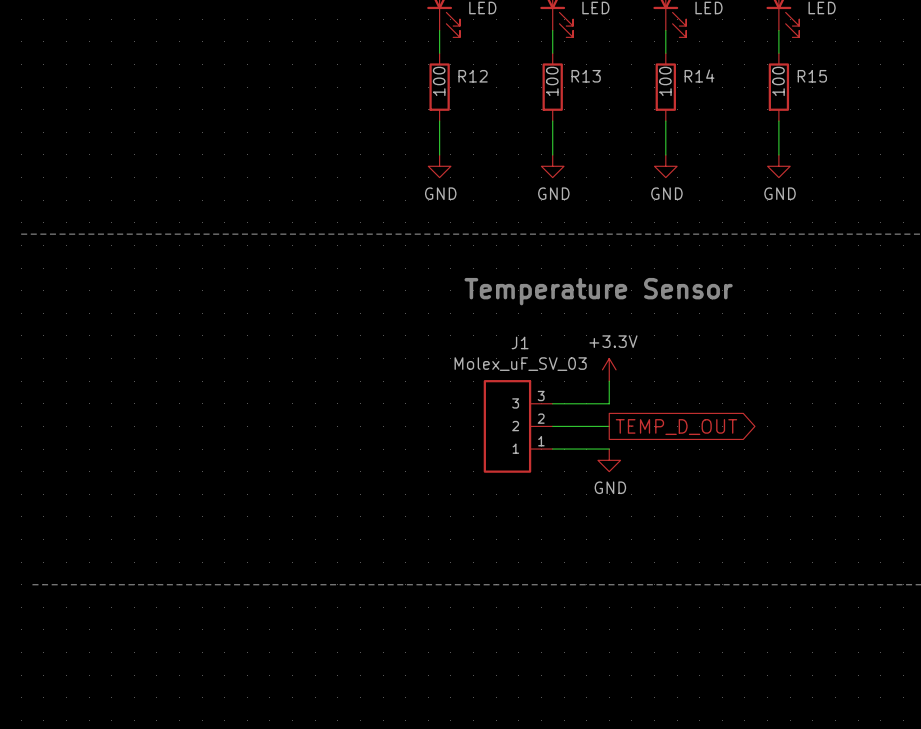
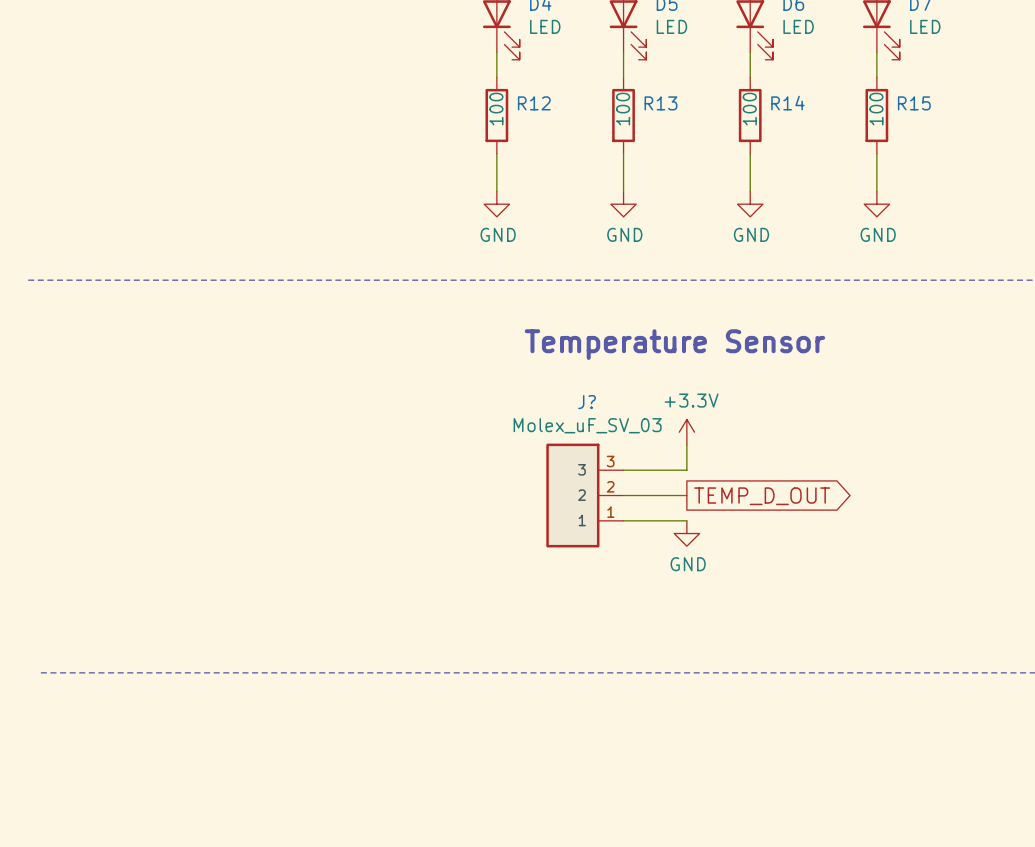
J1 name: J1 (520, 342) -> J? (587, 402)

